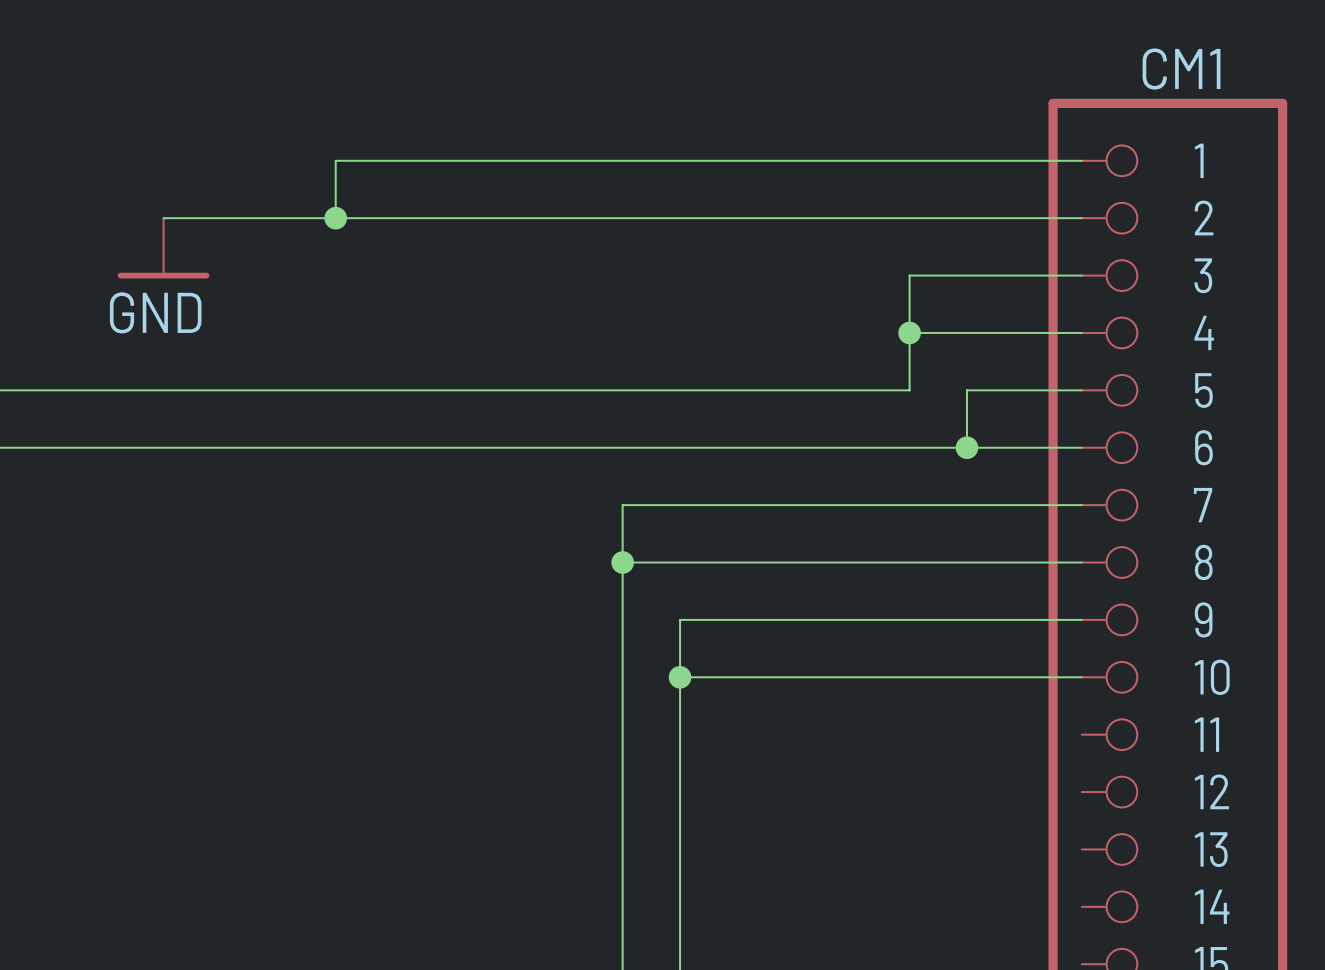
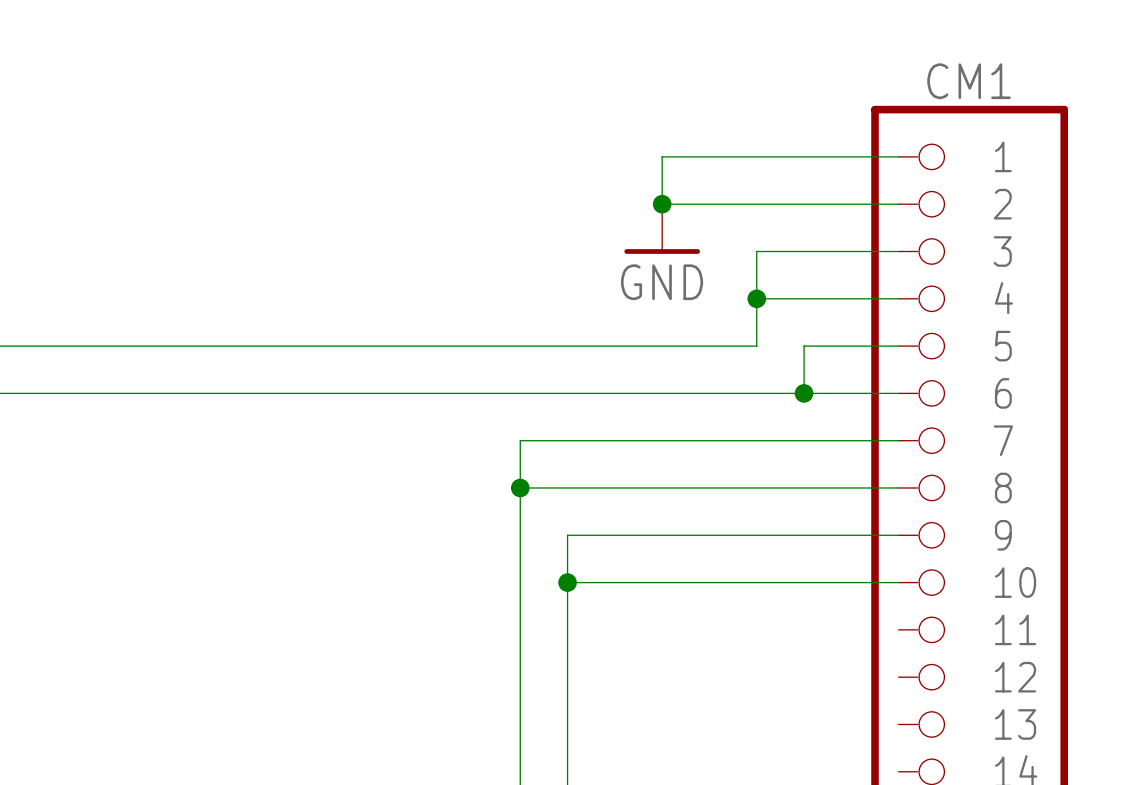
wire: (794, 160) (335, 160) (335, 218) -> (662, 156) (662, 204)
wire: (163, 218) (794, 218) -> none
junction: (335, 218) -> none
junction: none -> (662, 204)
power symbol: GND (163, 248) -> none
power symbol: none -> GND (662, 229)

